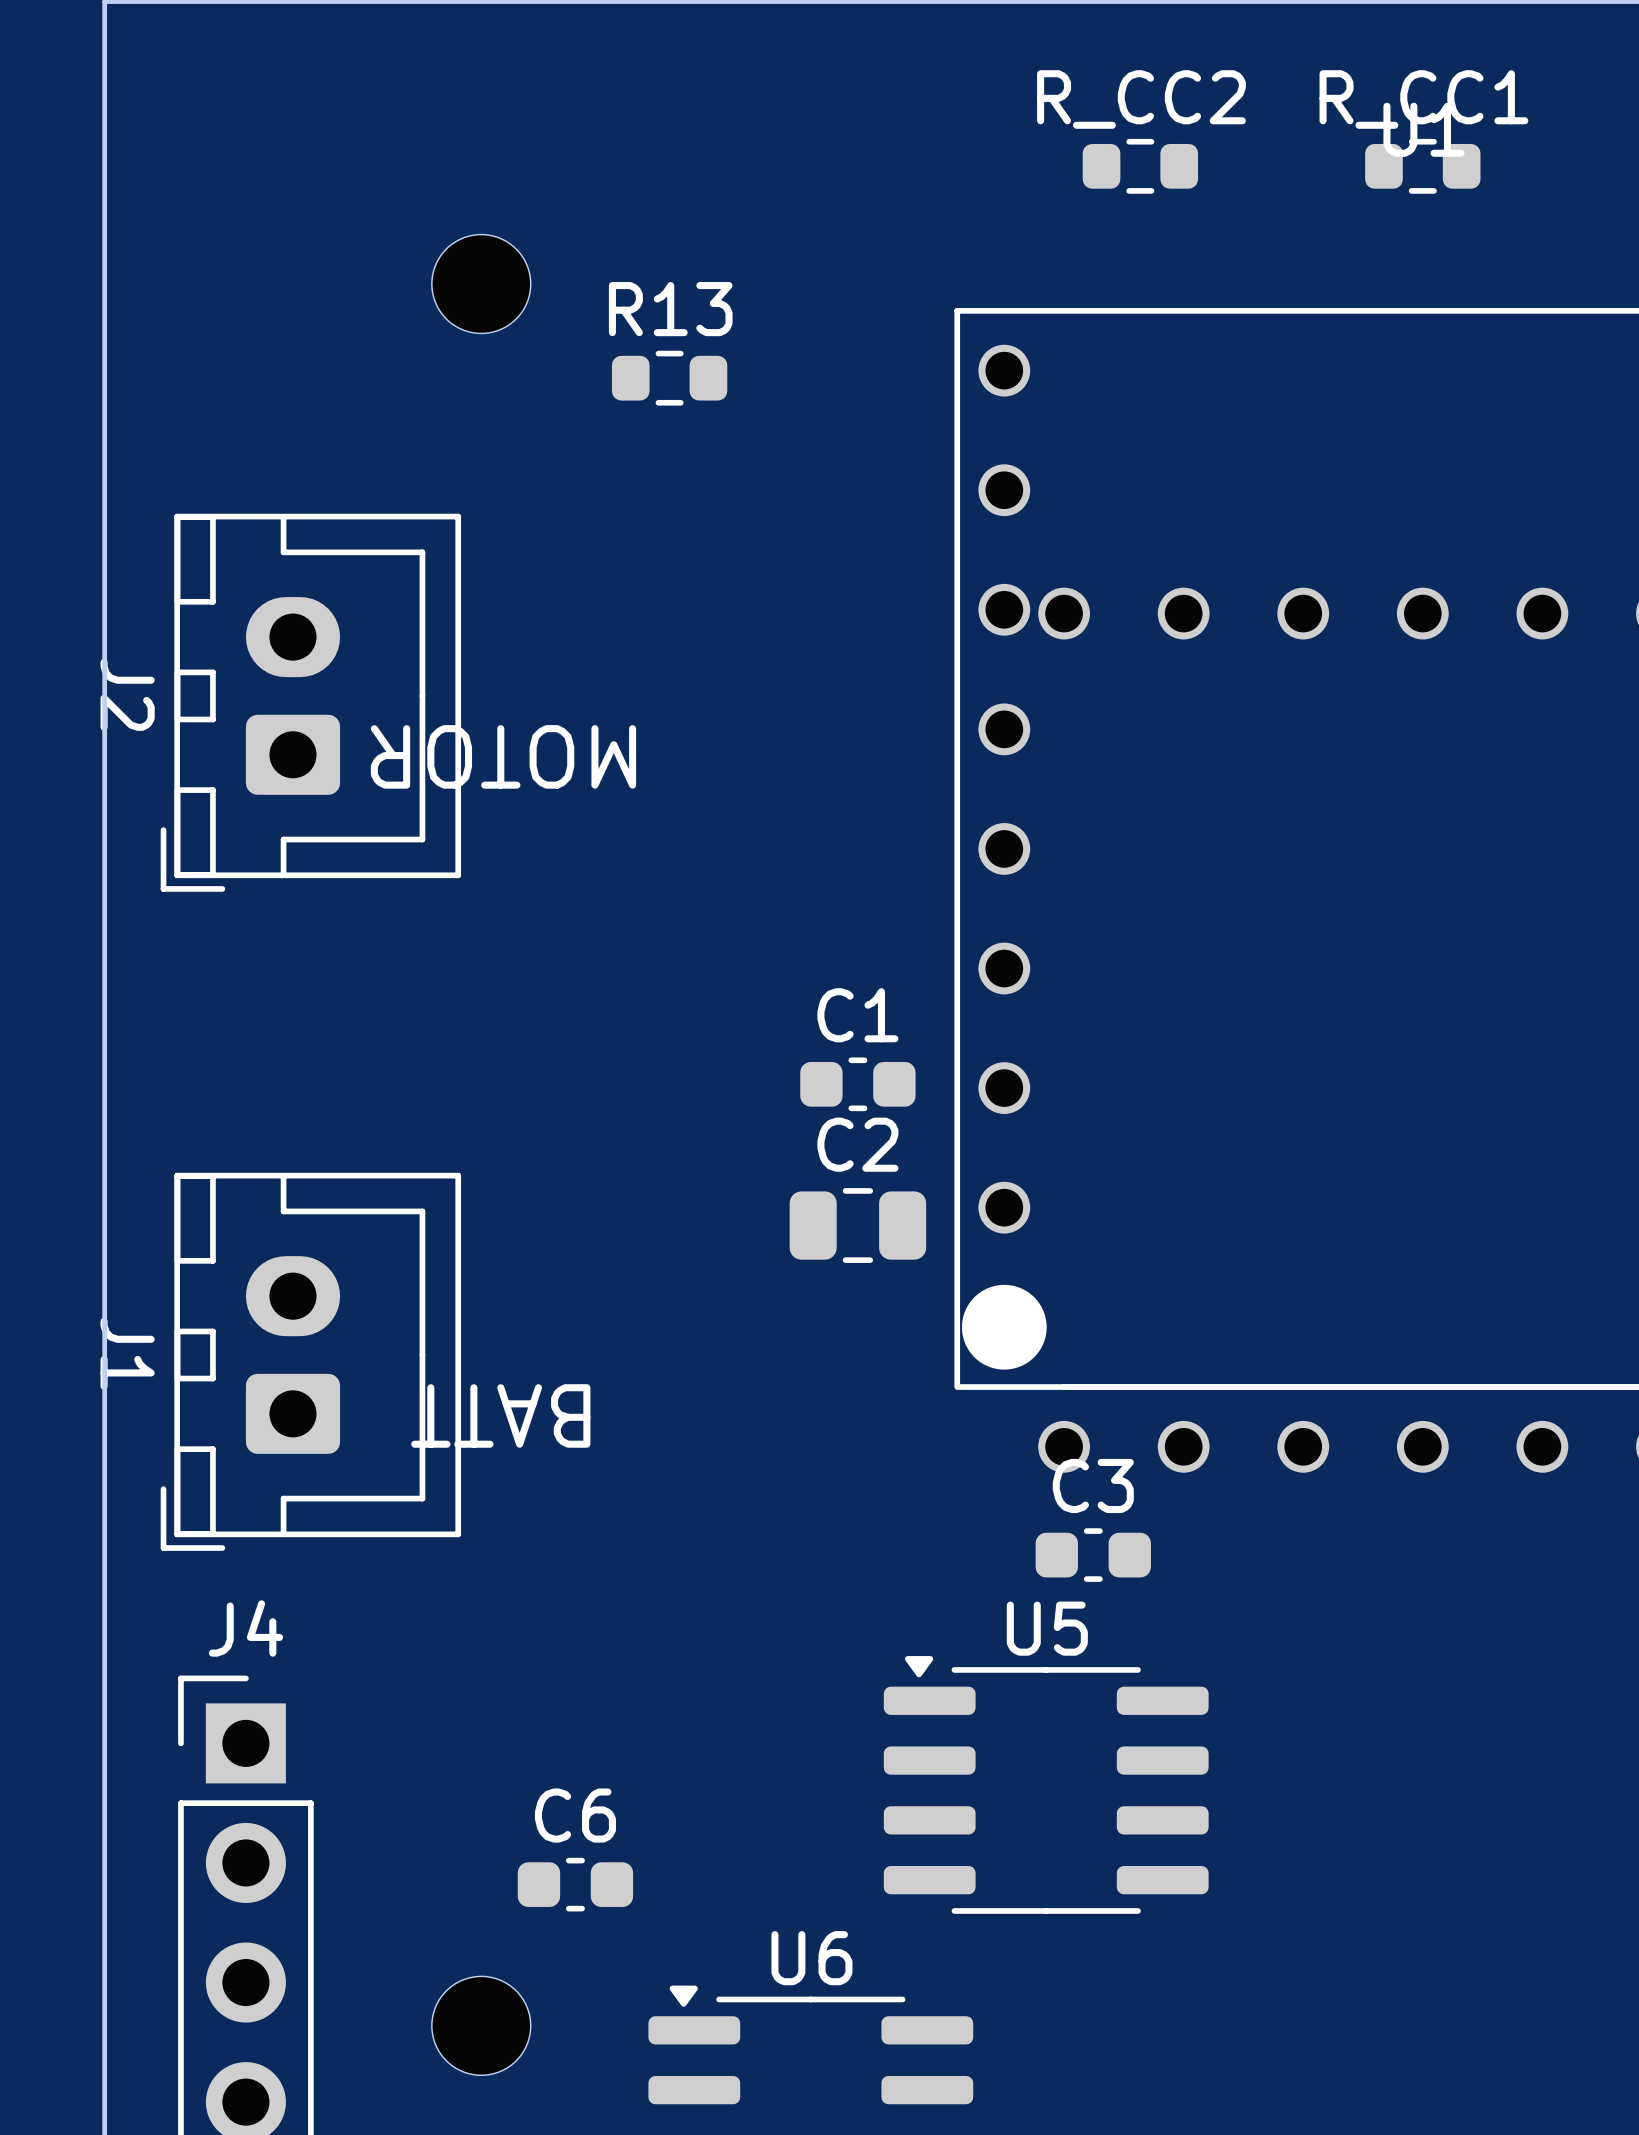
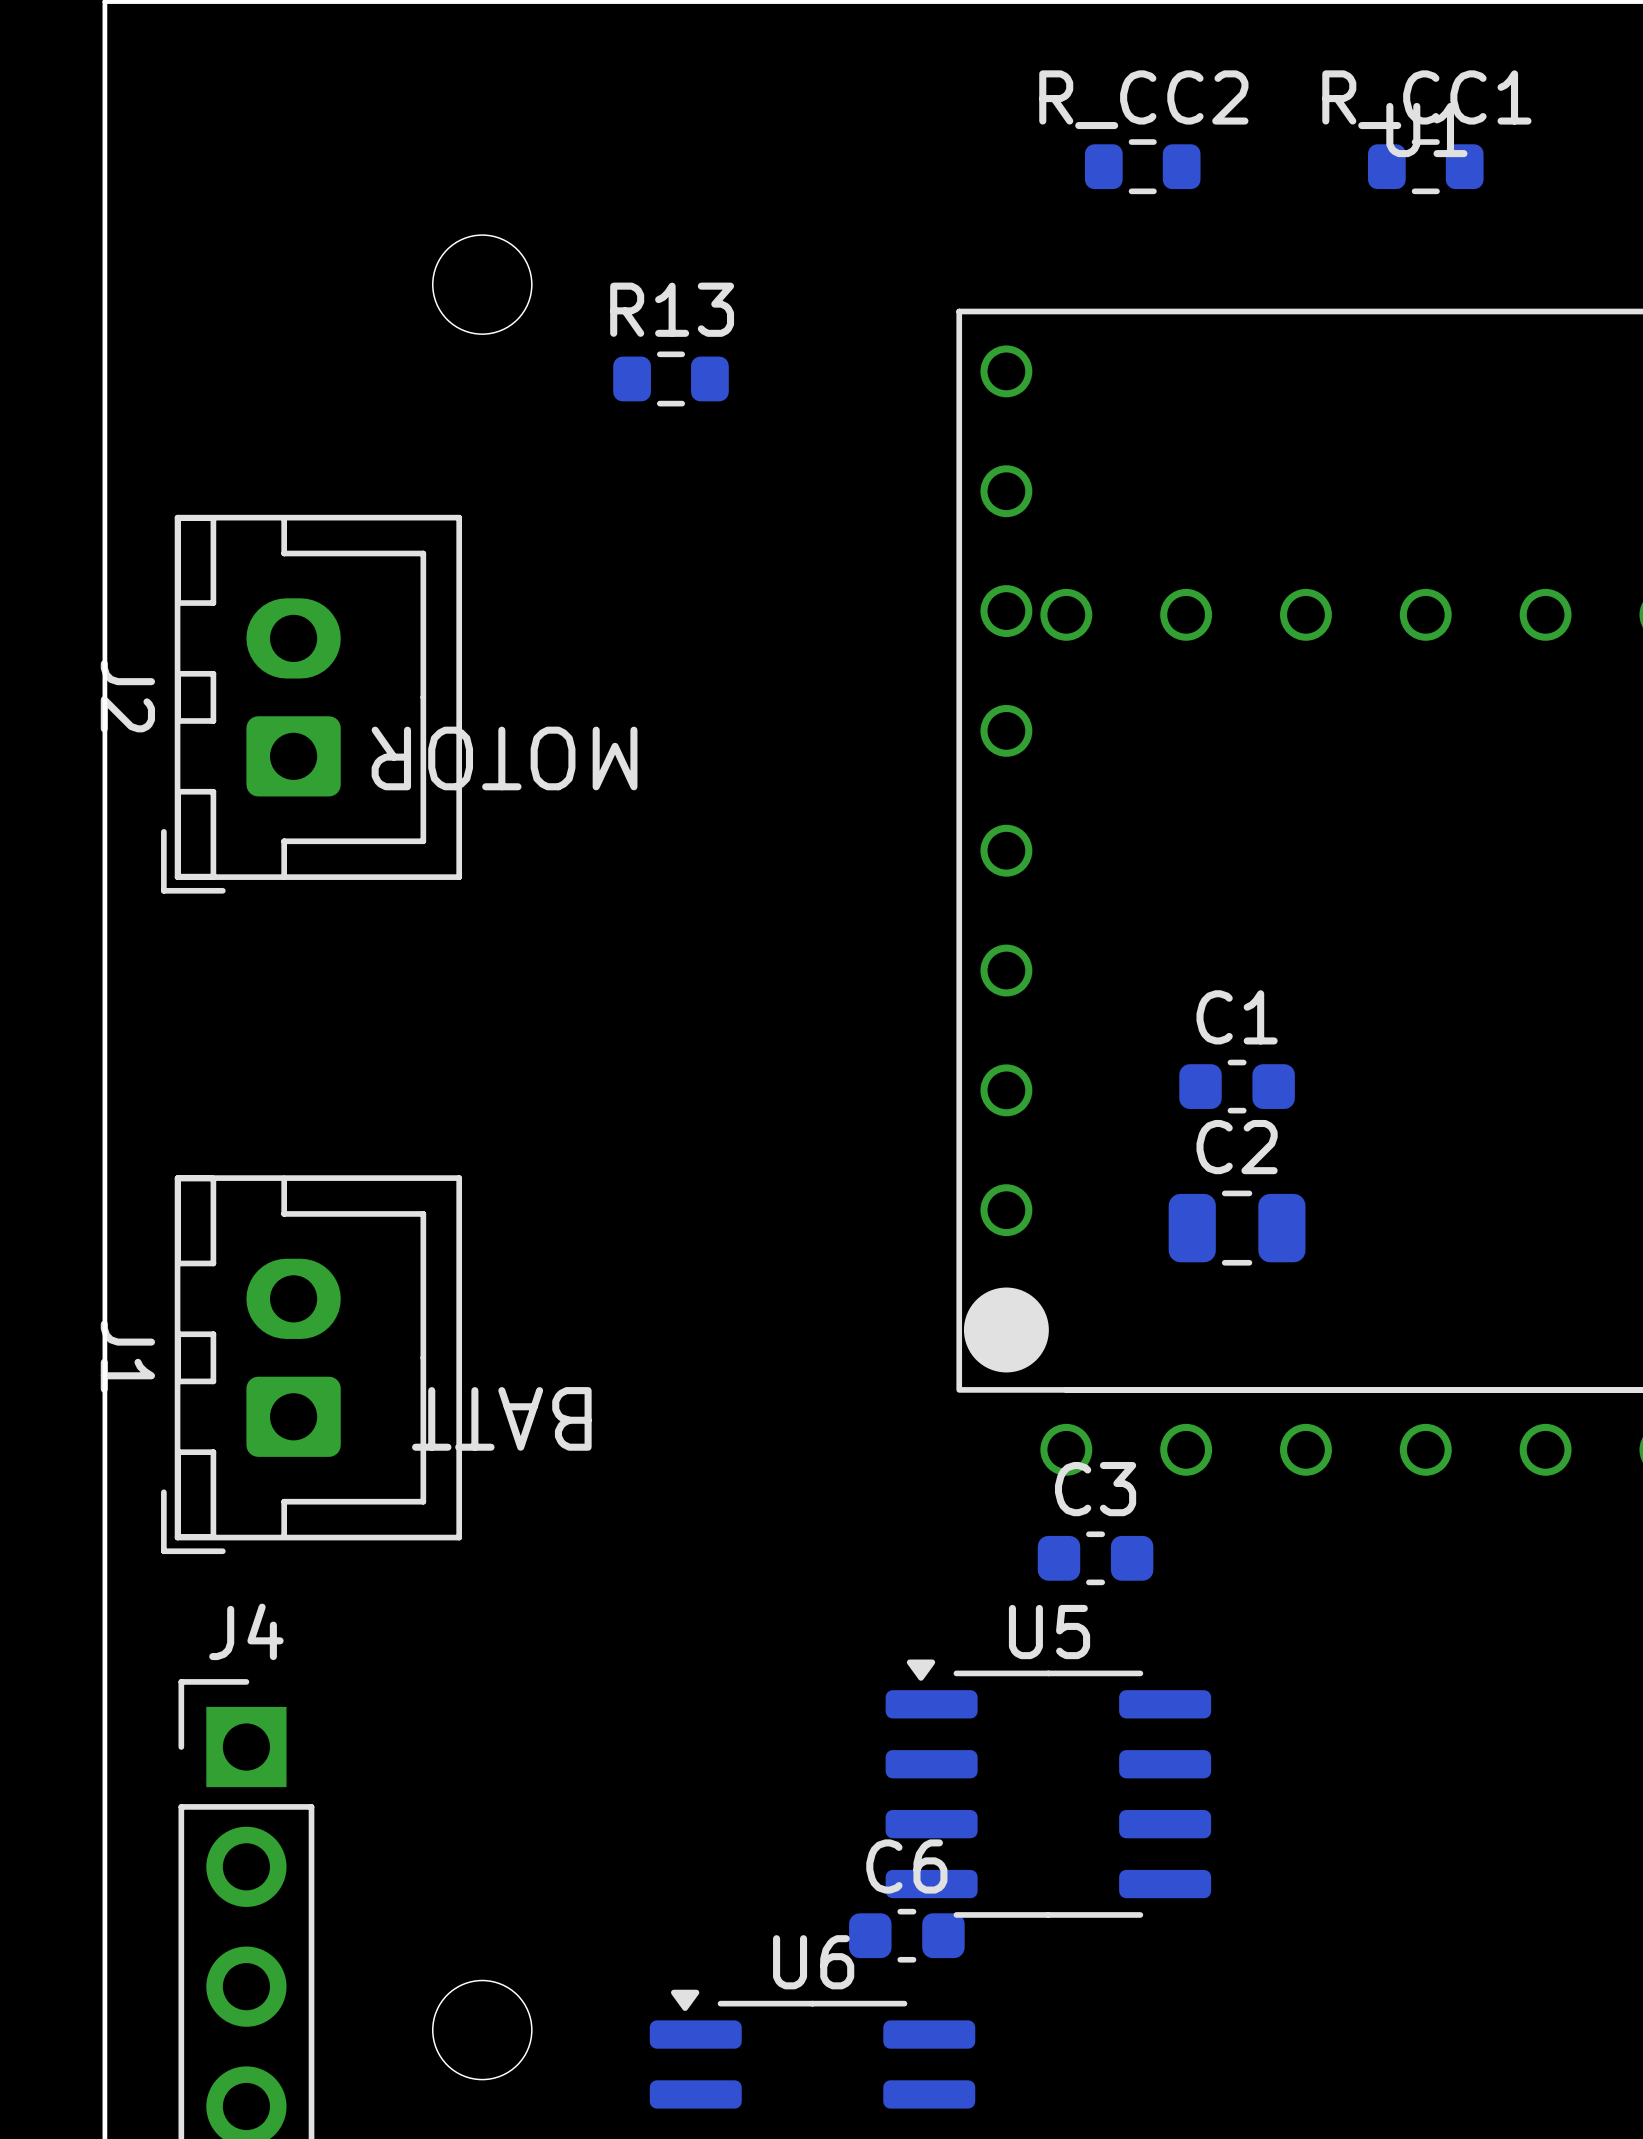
C1 position: (857, 1084) -> (1237, 1086)
C2 position: (857, 1225) -> (1237, 1228)
C6 position: (575, 1884) -> (906, 1935)

